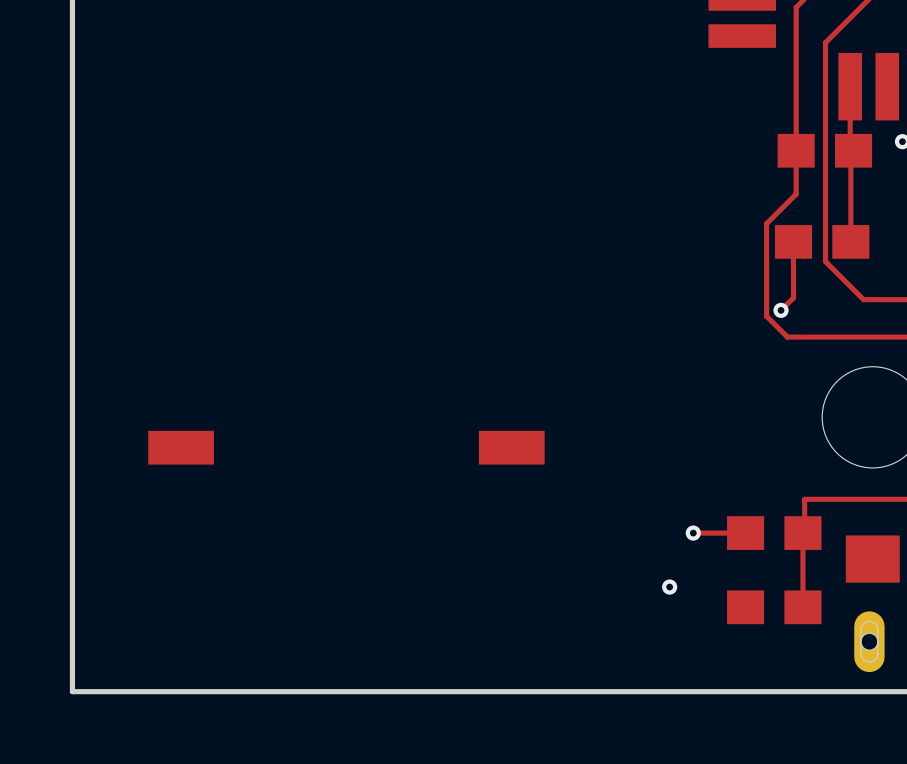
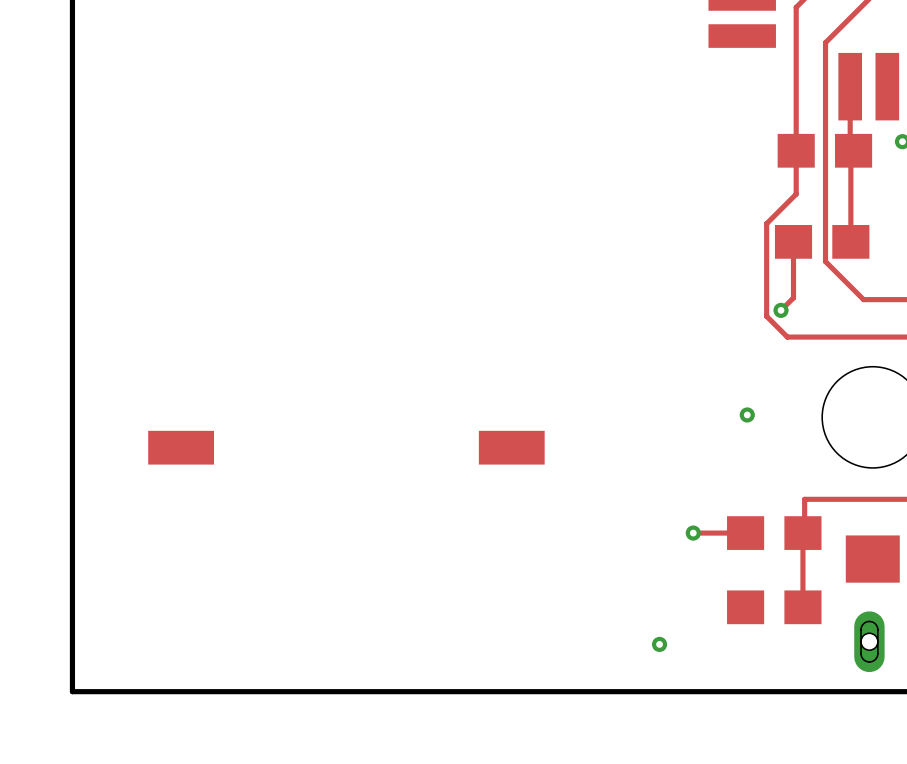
via: none -> (747, 414)
via position: (669, 587) -> (659, 644)

